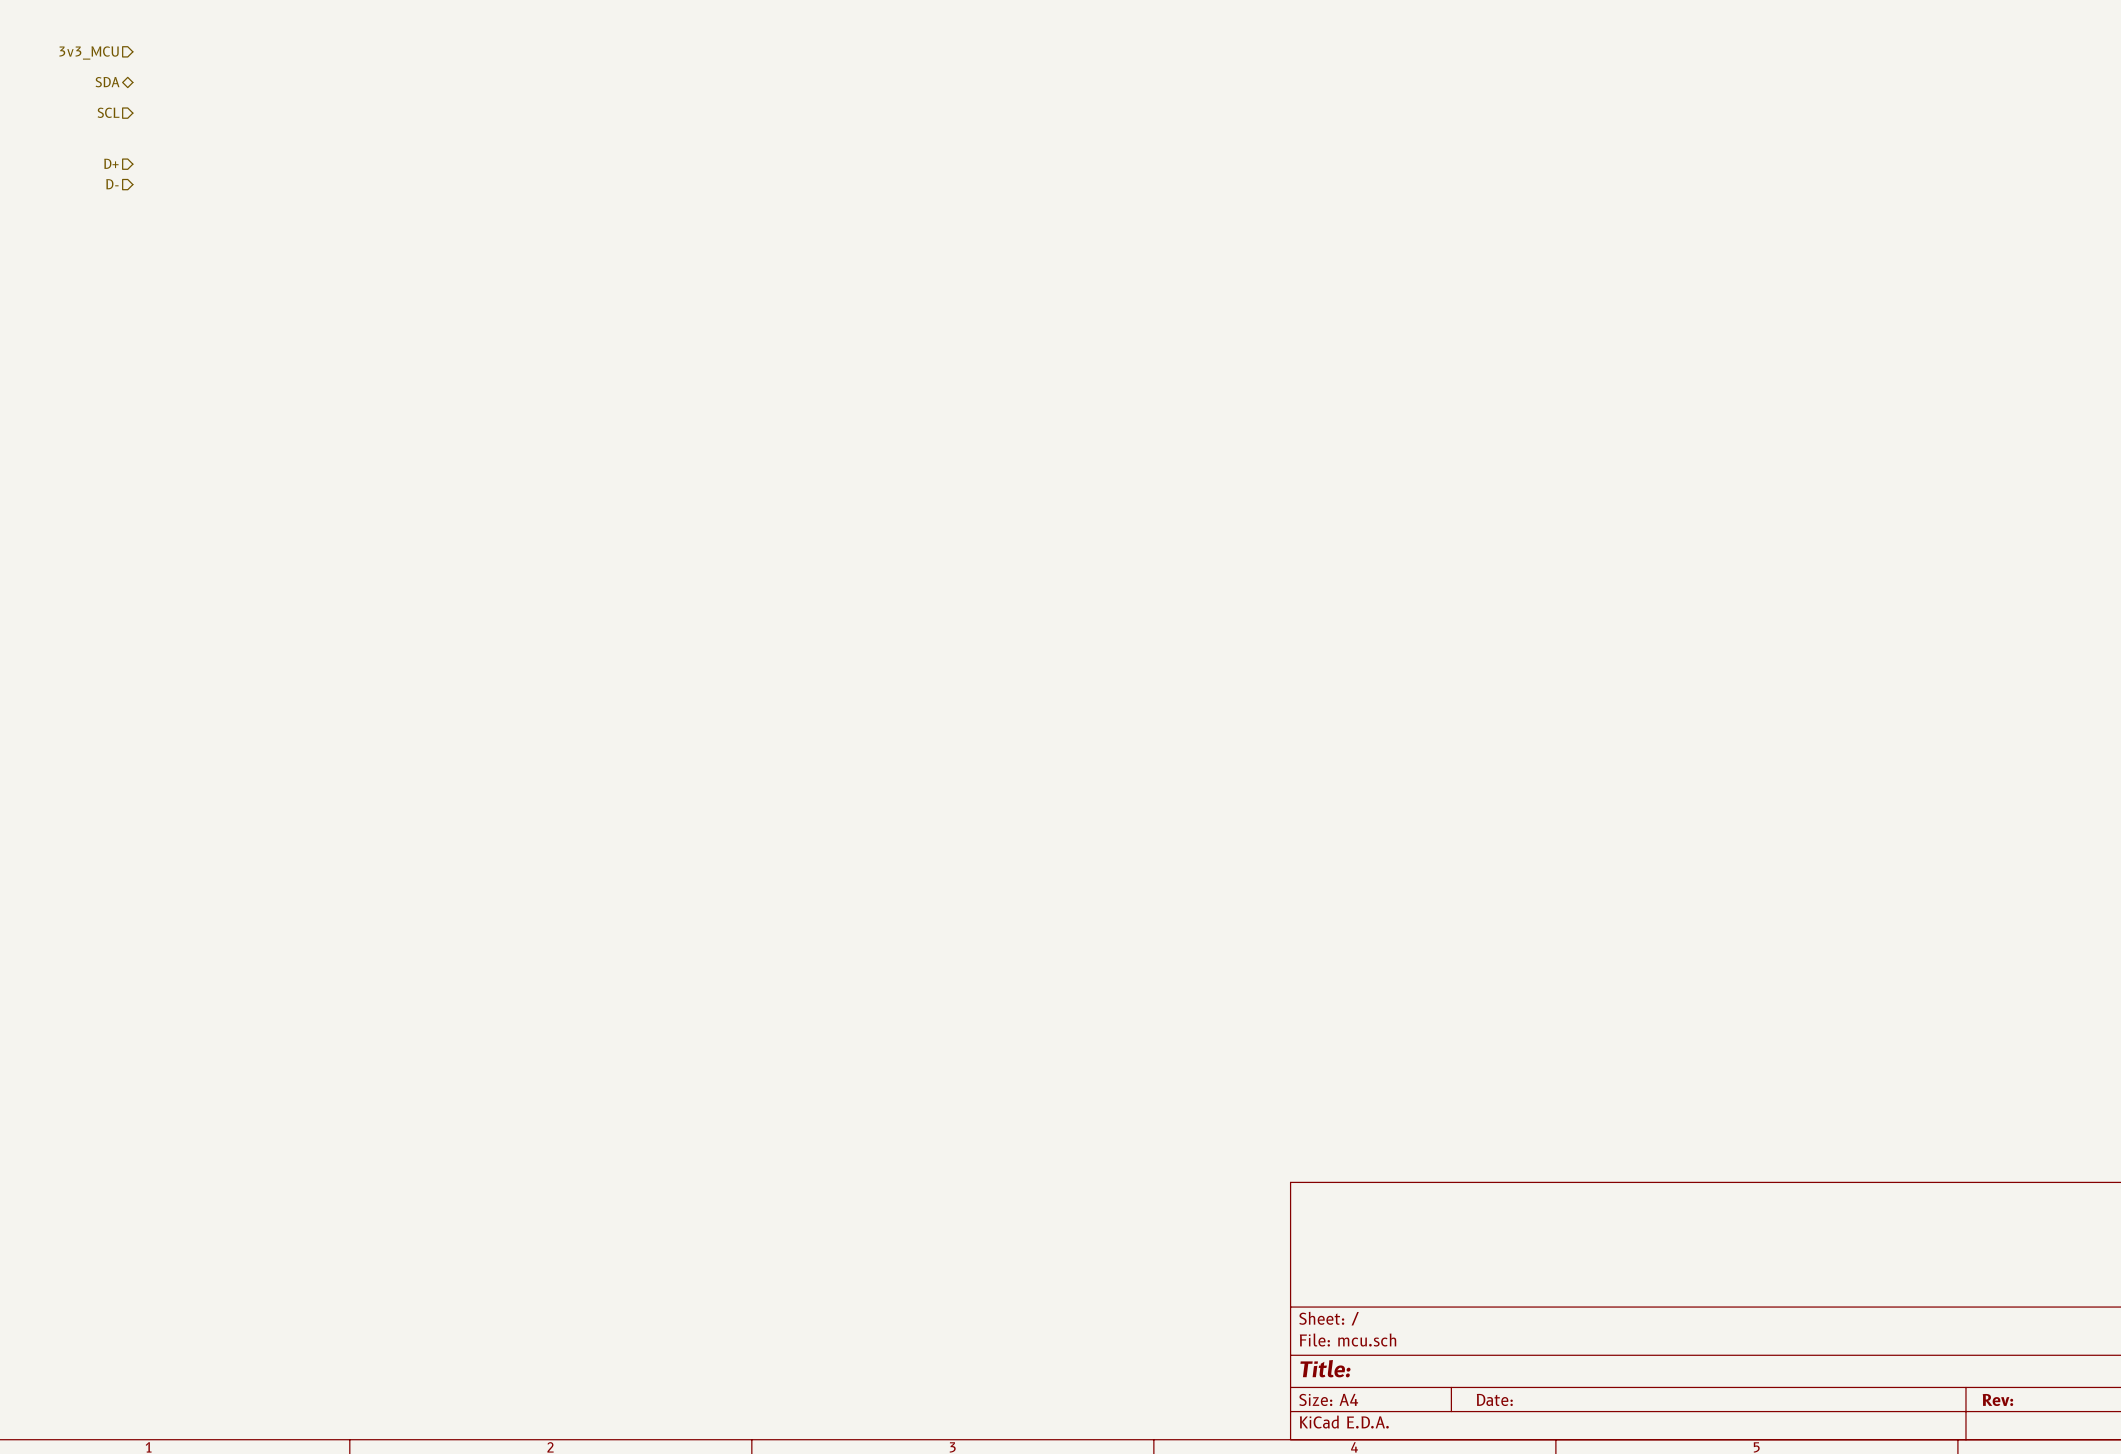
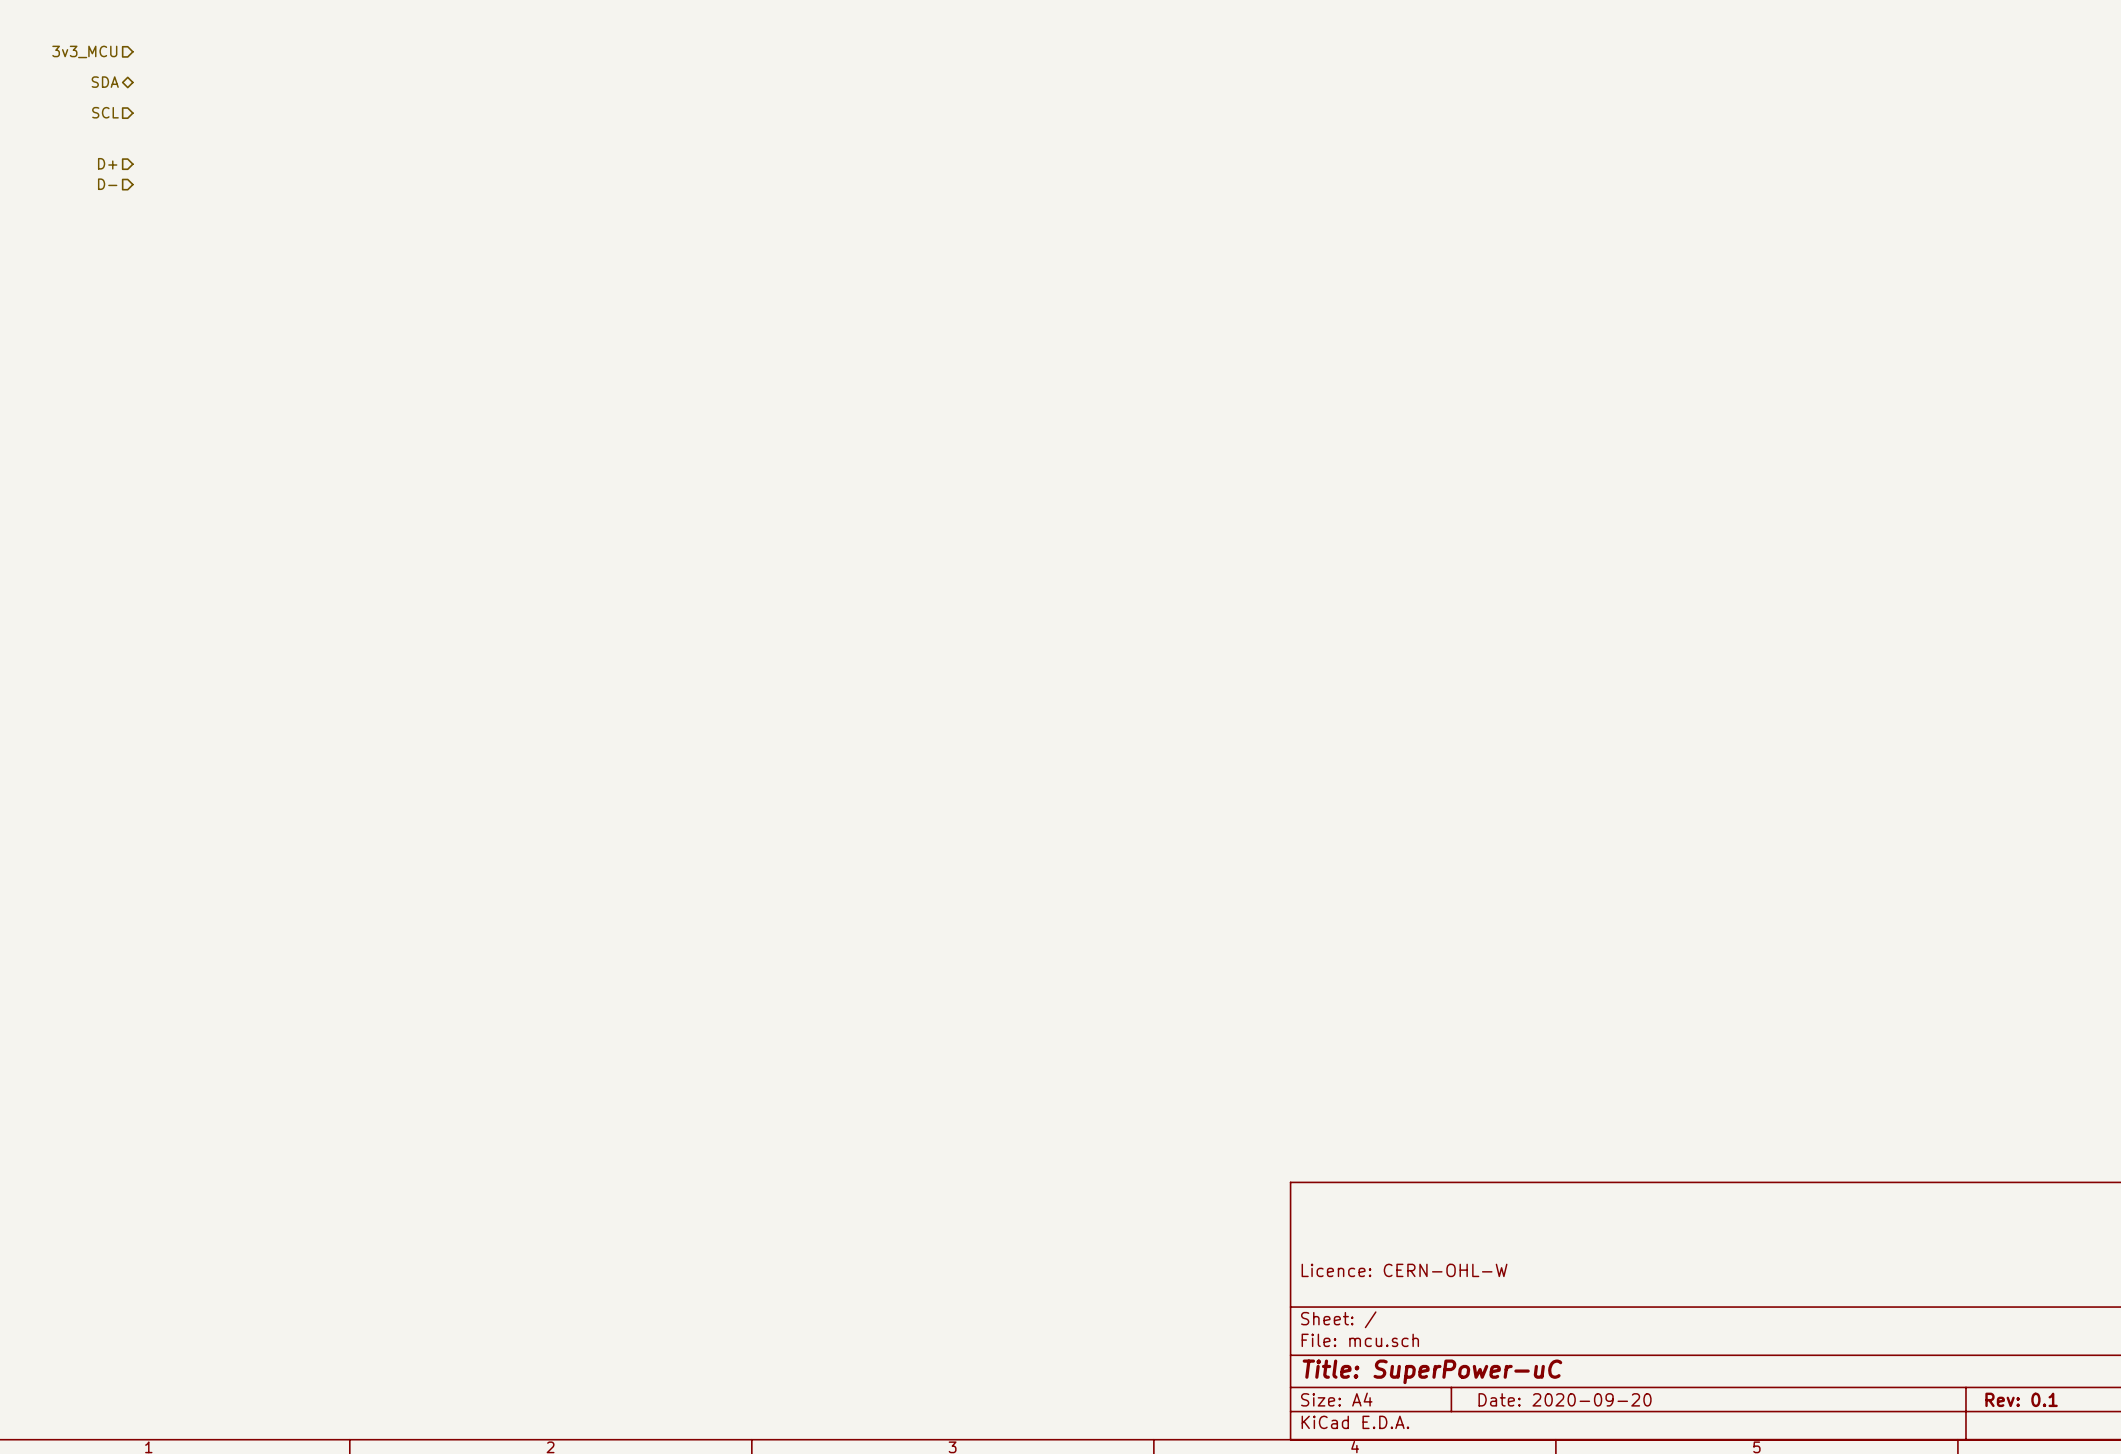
title block: none -> Licence: CERN-OHL-W (1404, 1270)
title block: Title: (1325, 1368) -> Title: SuperPower-uC (1432, 1371)
title block: Date: (1494, 1399) -> Date: 2020-09-20 (1565, 1399)
title block: Rev: (1997, 1400) -> Rev: 0.1 (2021, 1399)

